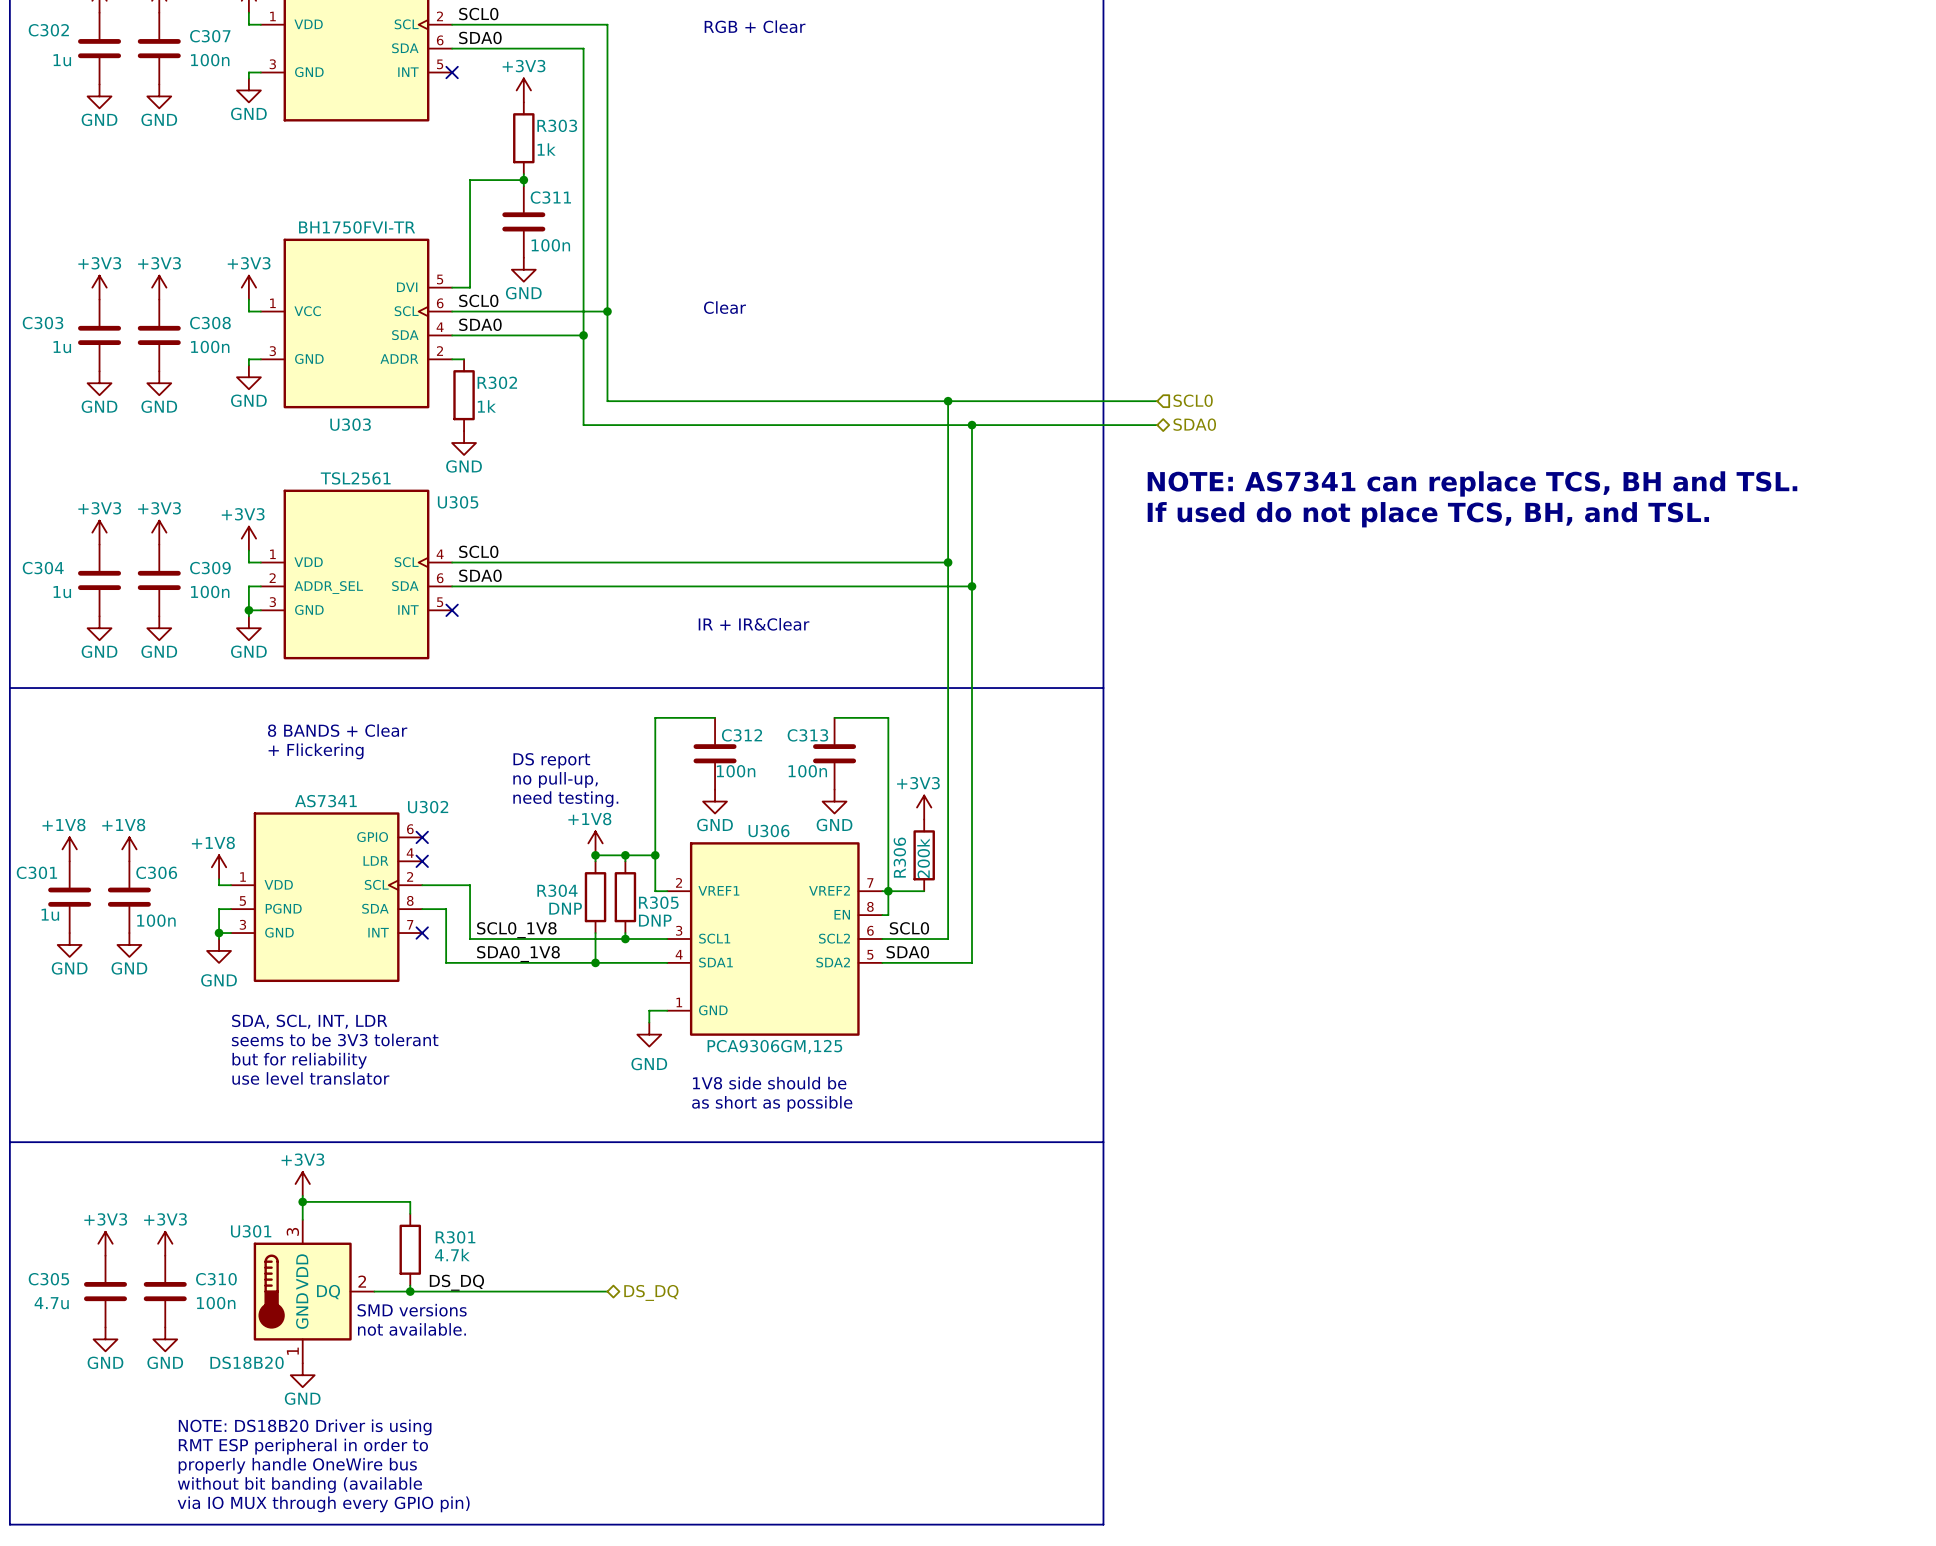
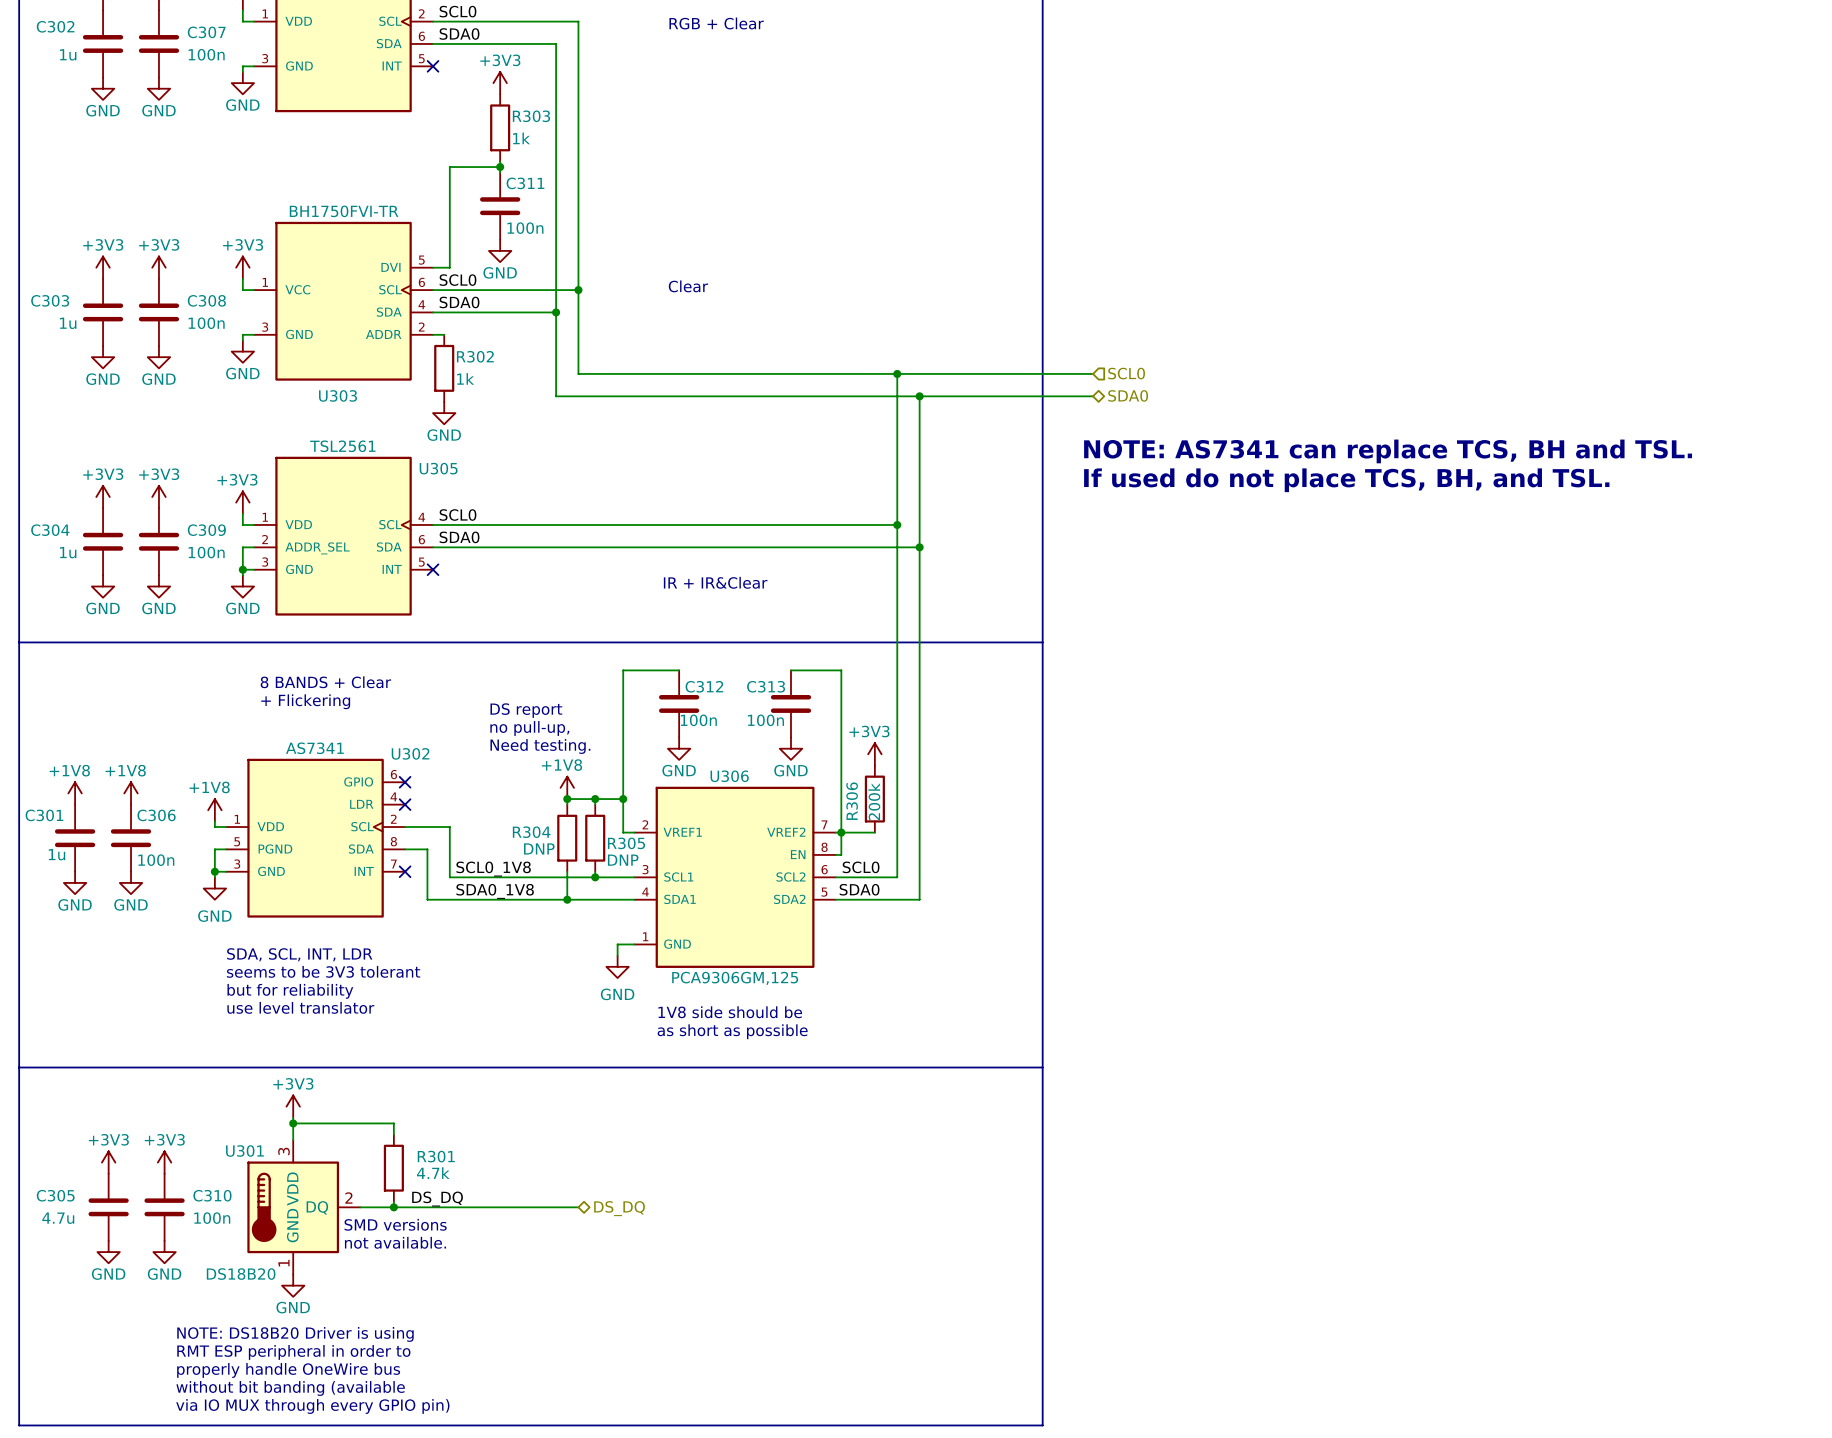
text: need testing. (565, 799) -> Need testing. (540, 746)

